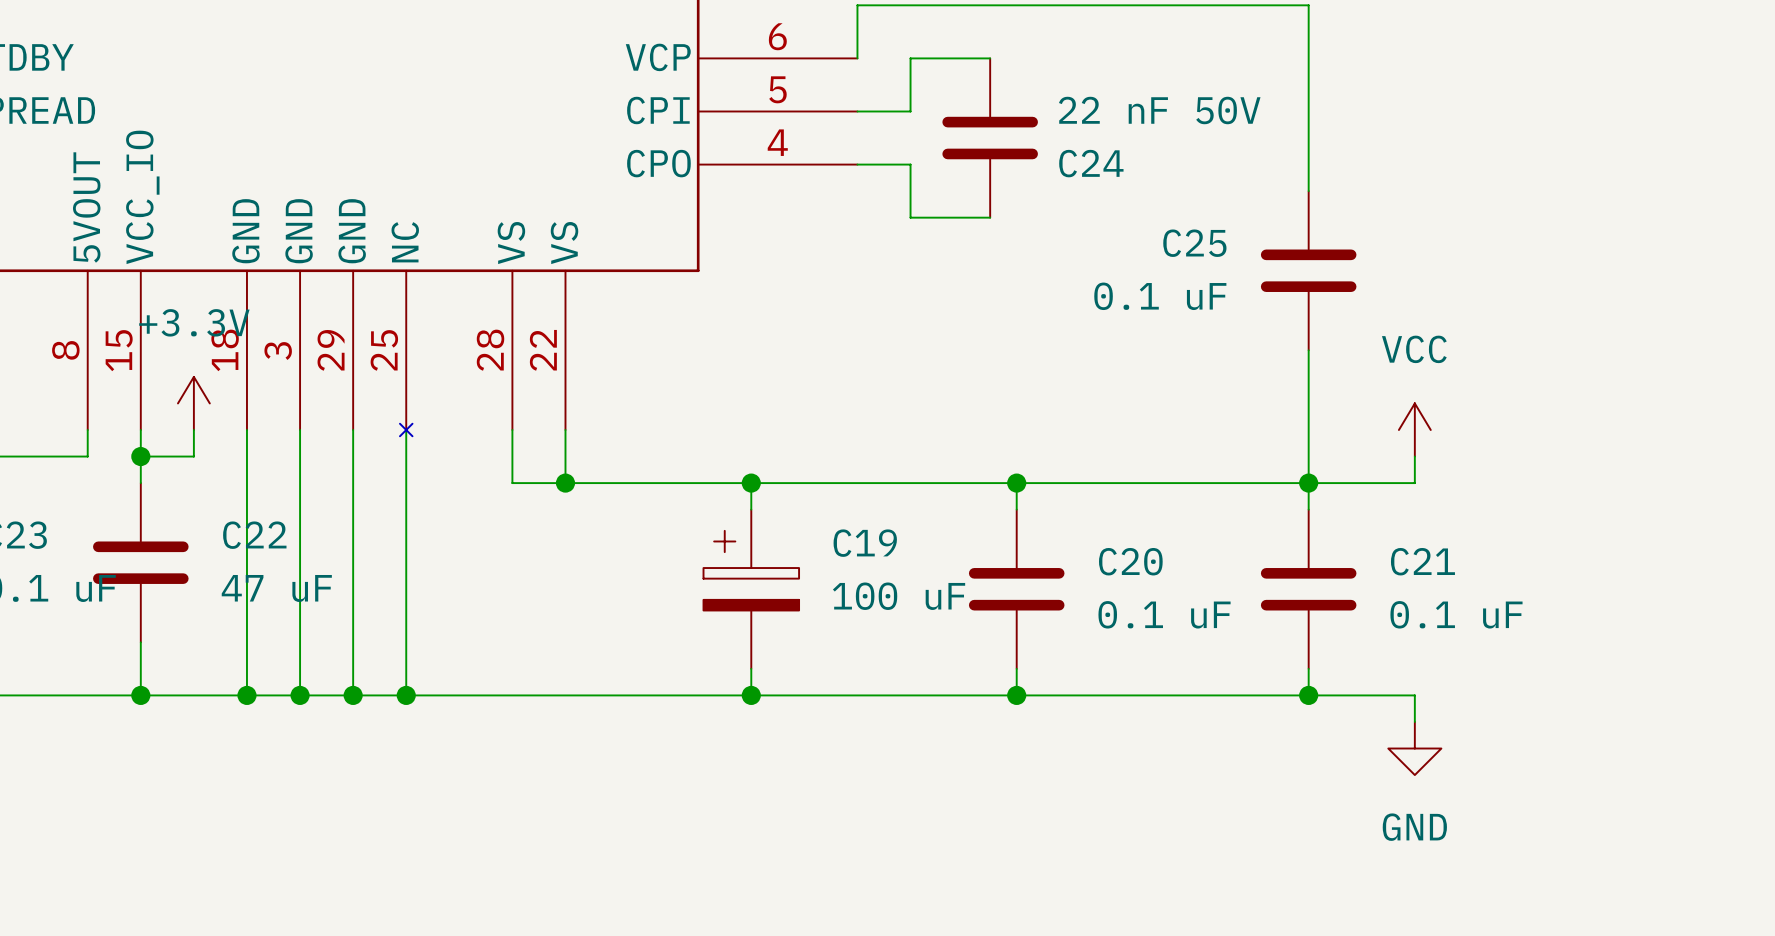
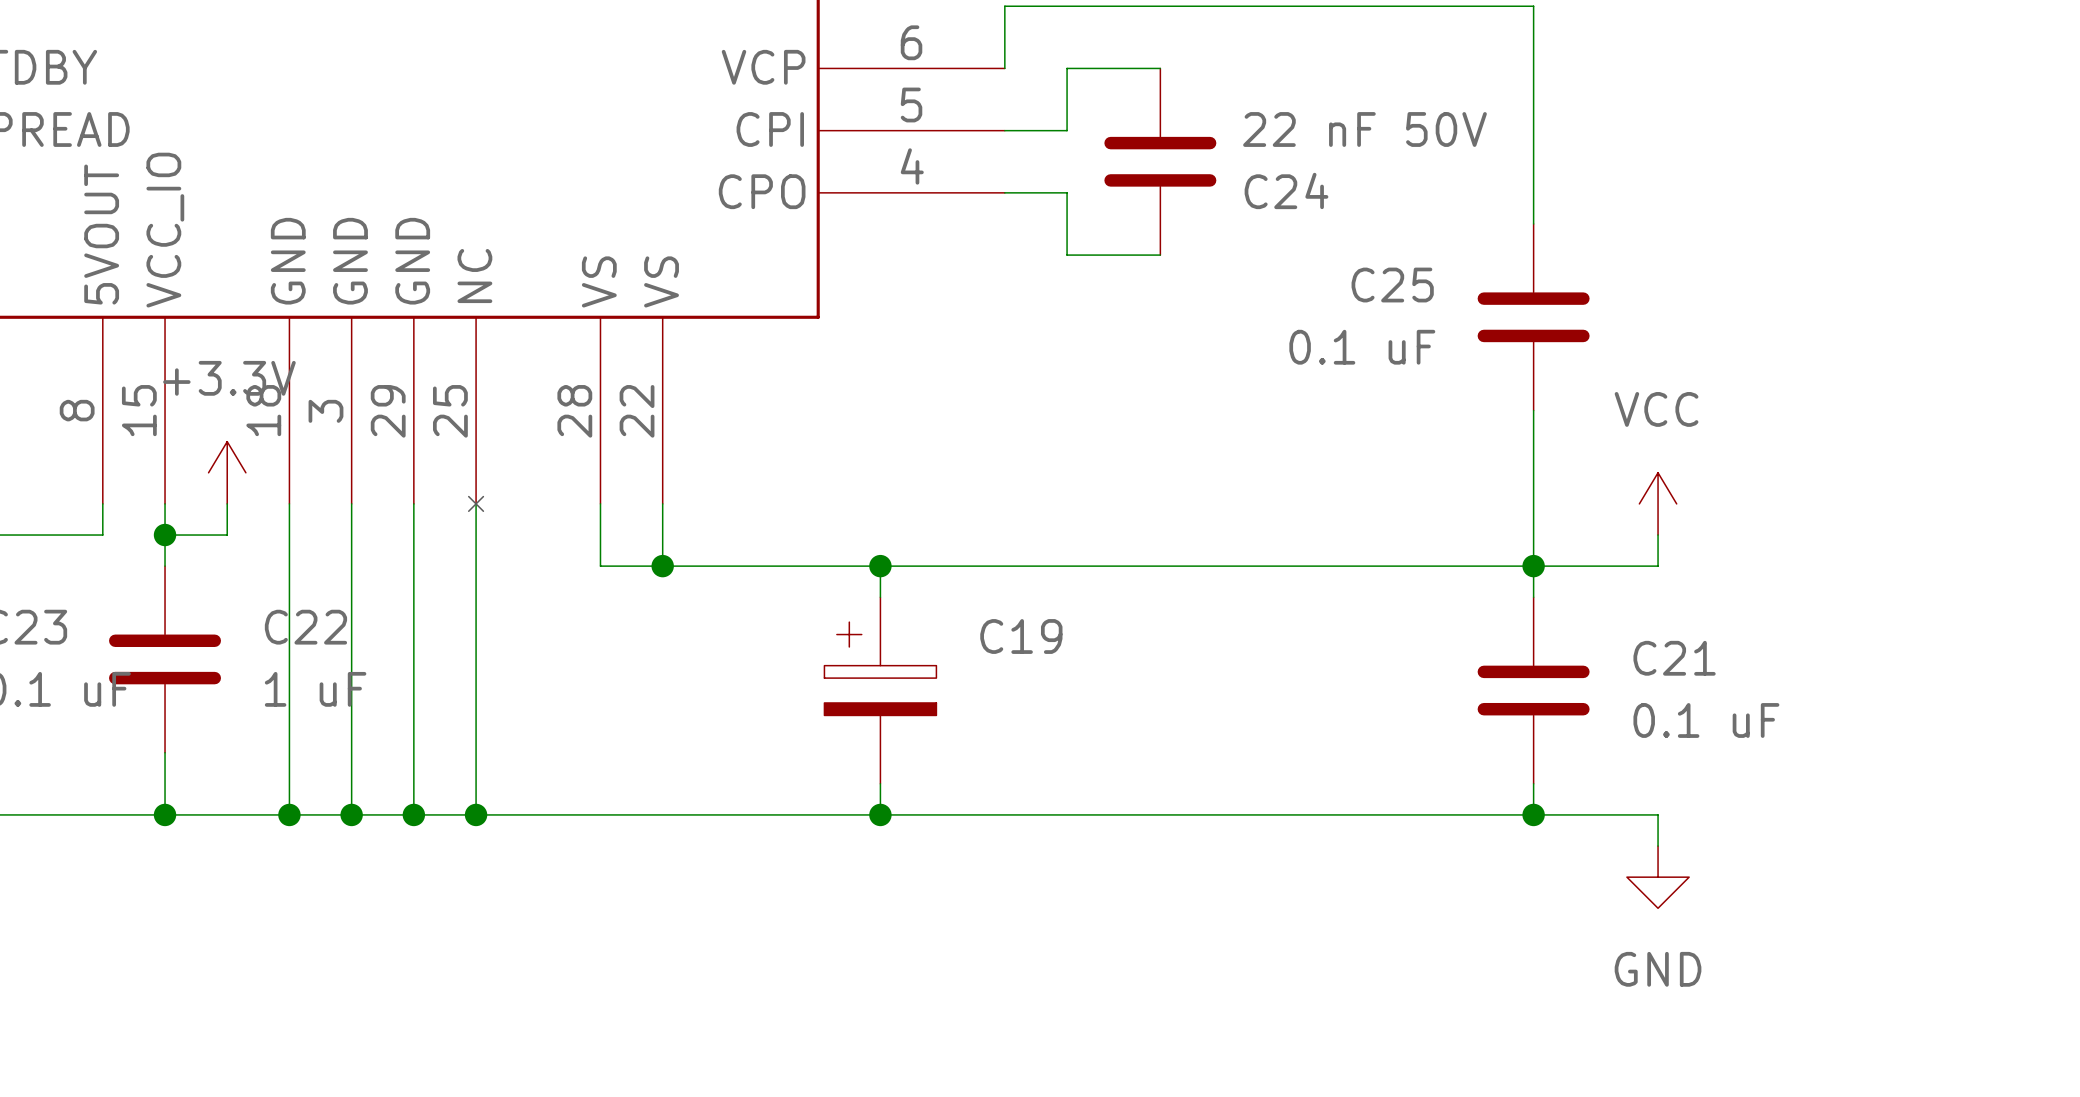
wire: (1016, 483) (1016, 509) -> none
junction: (1016, 483) -> none
C22 value: 47 uF (276, 588) -> 1 uF (315, 689)
C20: 0.1 uF (1016, 589) -> none
C19 value: 100 uF (899, 596) -> none
wire: (1016, 668) (1016, 695) -> none
junction: (1016, 695) -> none

